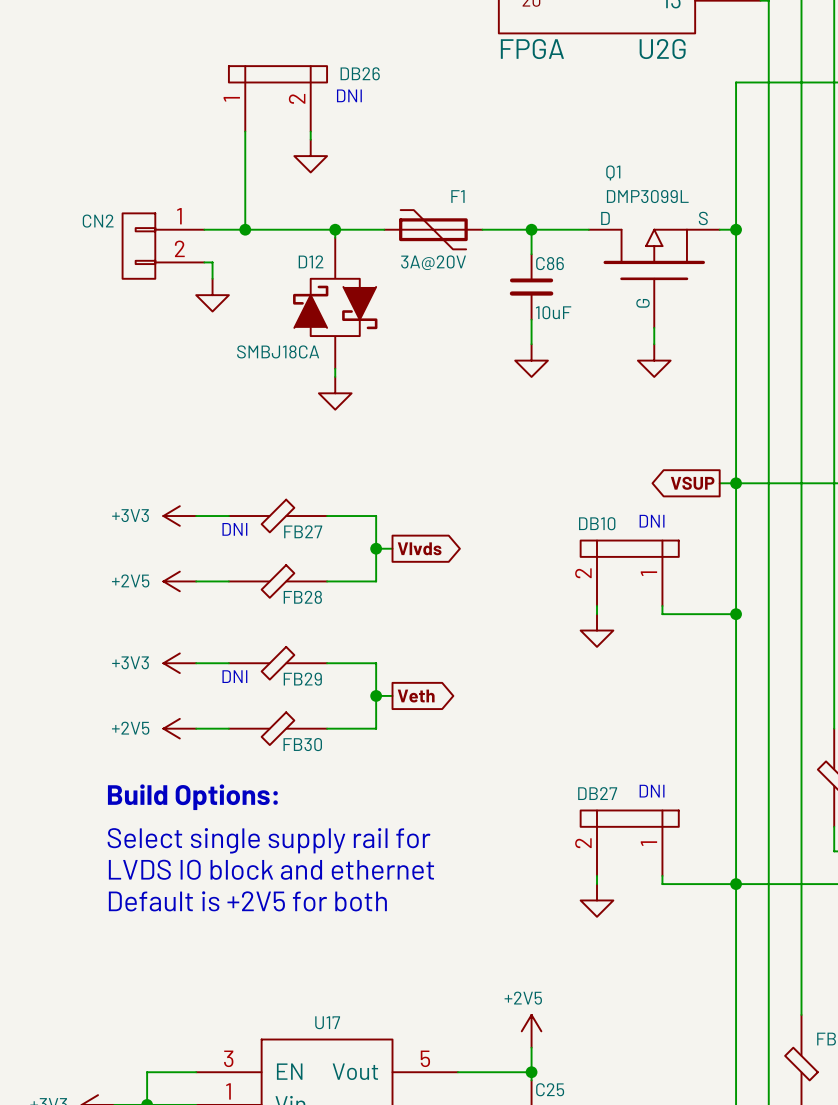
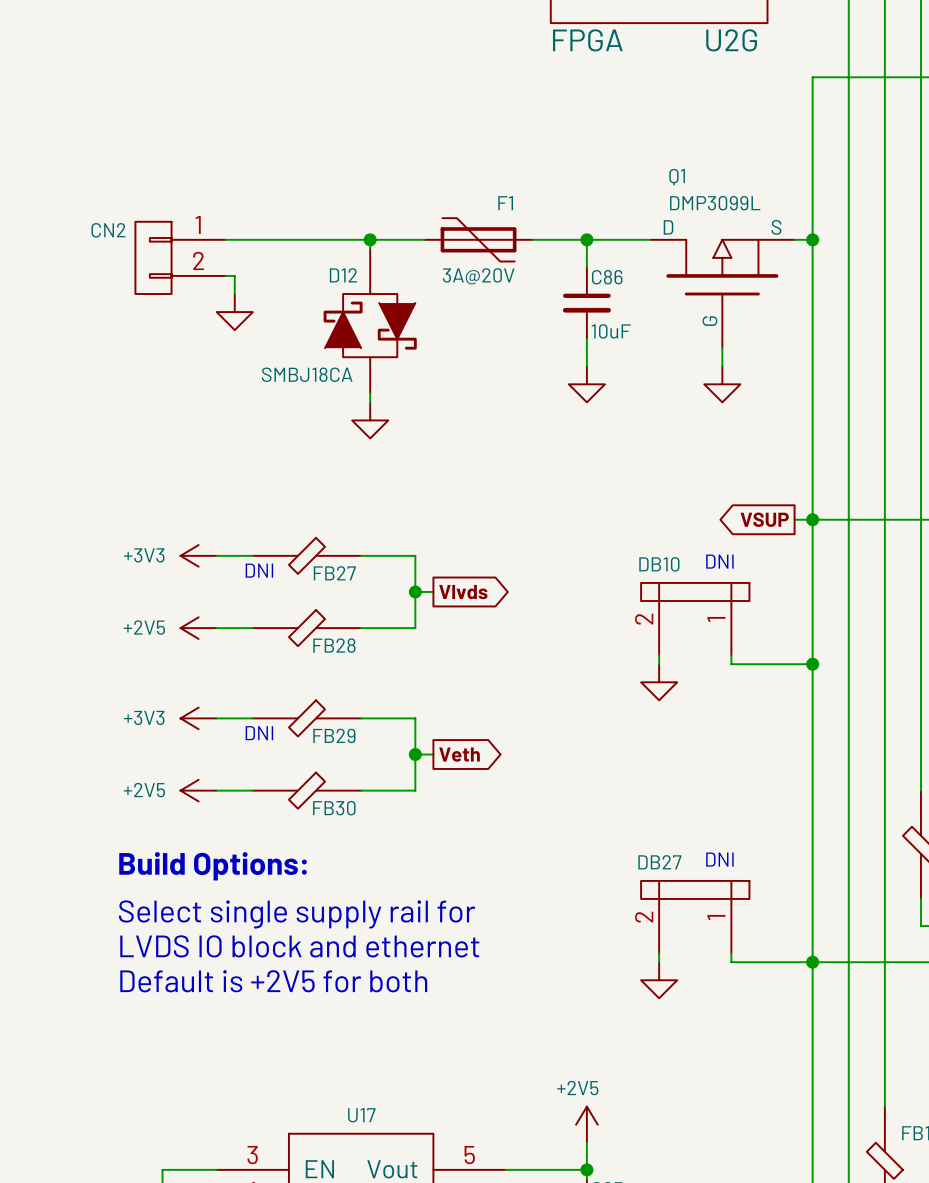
text: DNI (349, 95) -> none
DB26: (277, 98) -> none
wire: (245, 131) (245, 229) -> none
wire: (310, 131) (310, 139) -> none
power symbol: (310, 156) -> none
junction: (245, 229) -> none

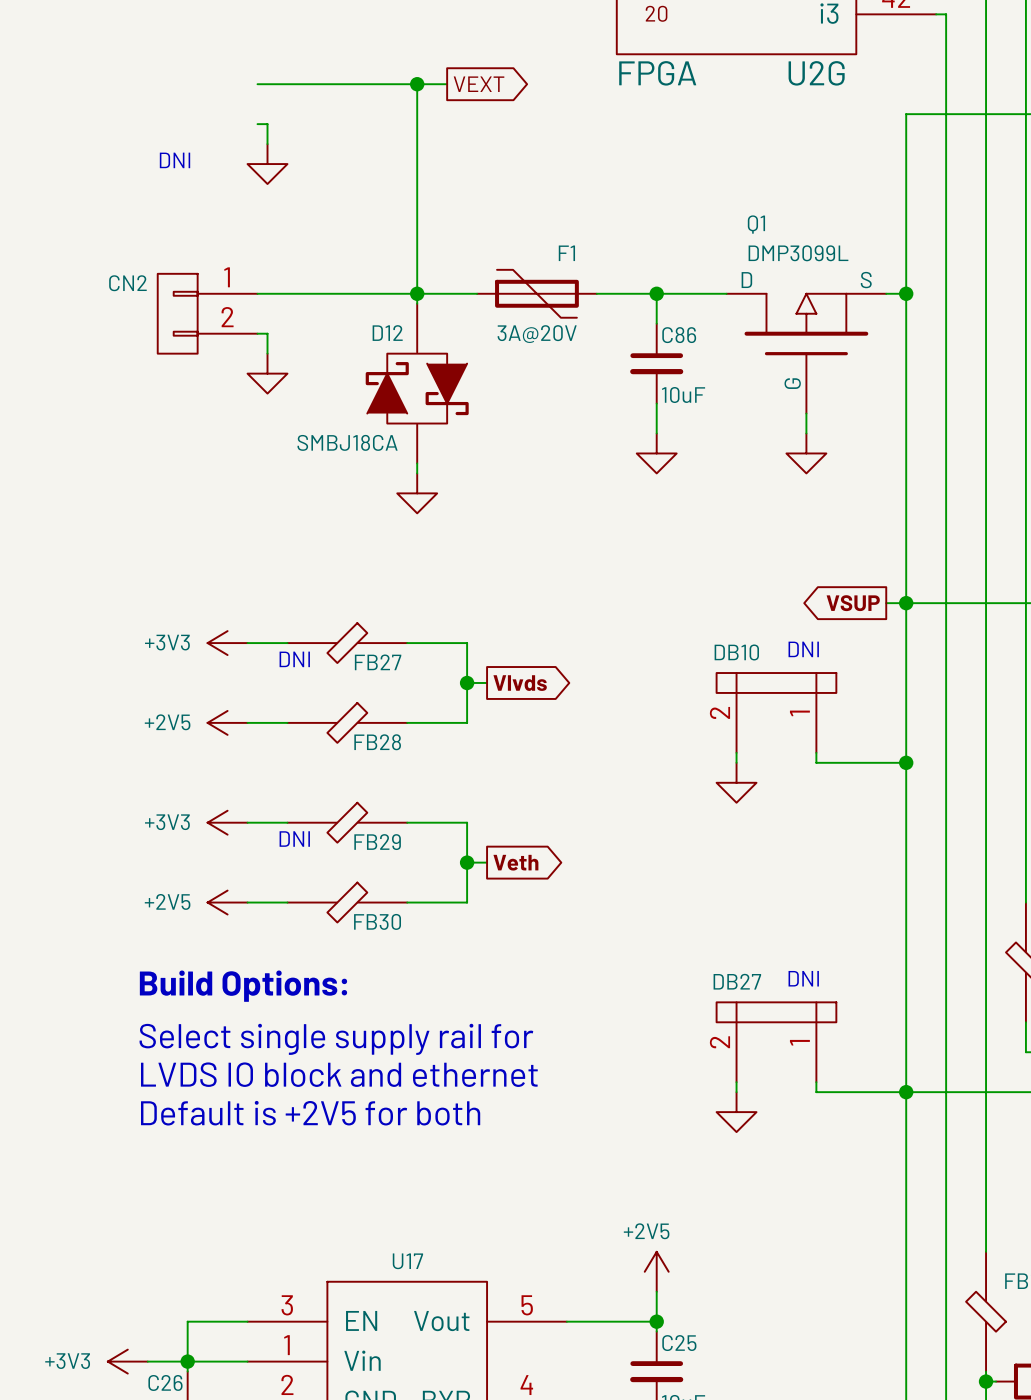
wire: none -> (257, 84) (447, 84)
wire: none -> (417, 84) (417, 293)
junction: none -> (417, 84)
global label: none -> VEXT (479, 84)
wire: none -> (257, 124) (267, 124) (267, 144)
text: none -> DNI (175, 160)
power symbol: none -> (267, 164)

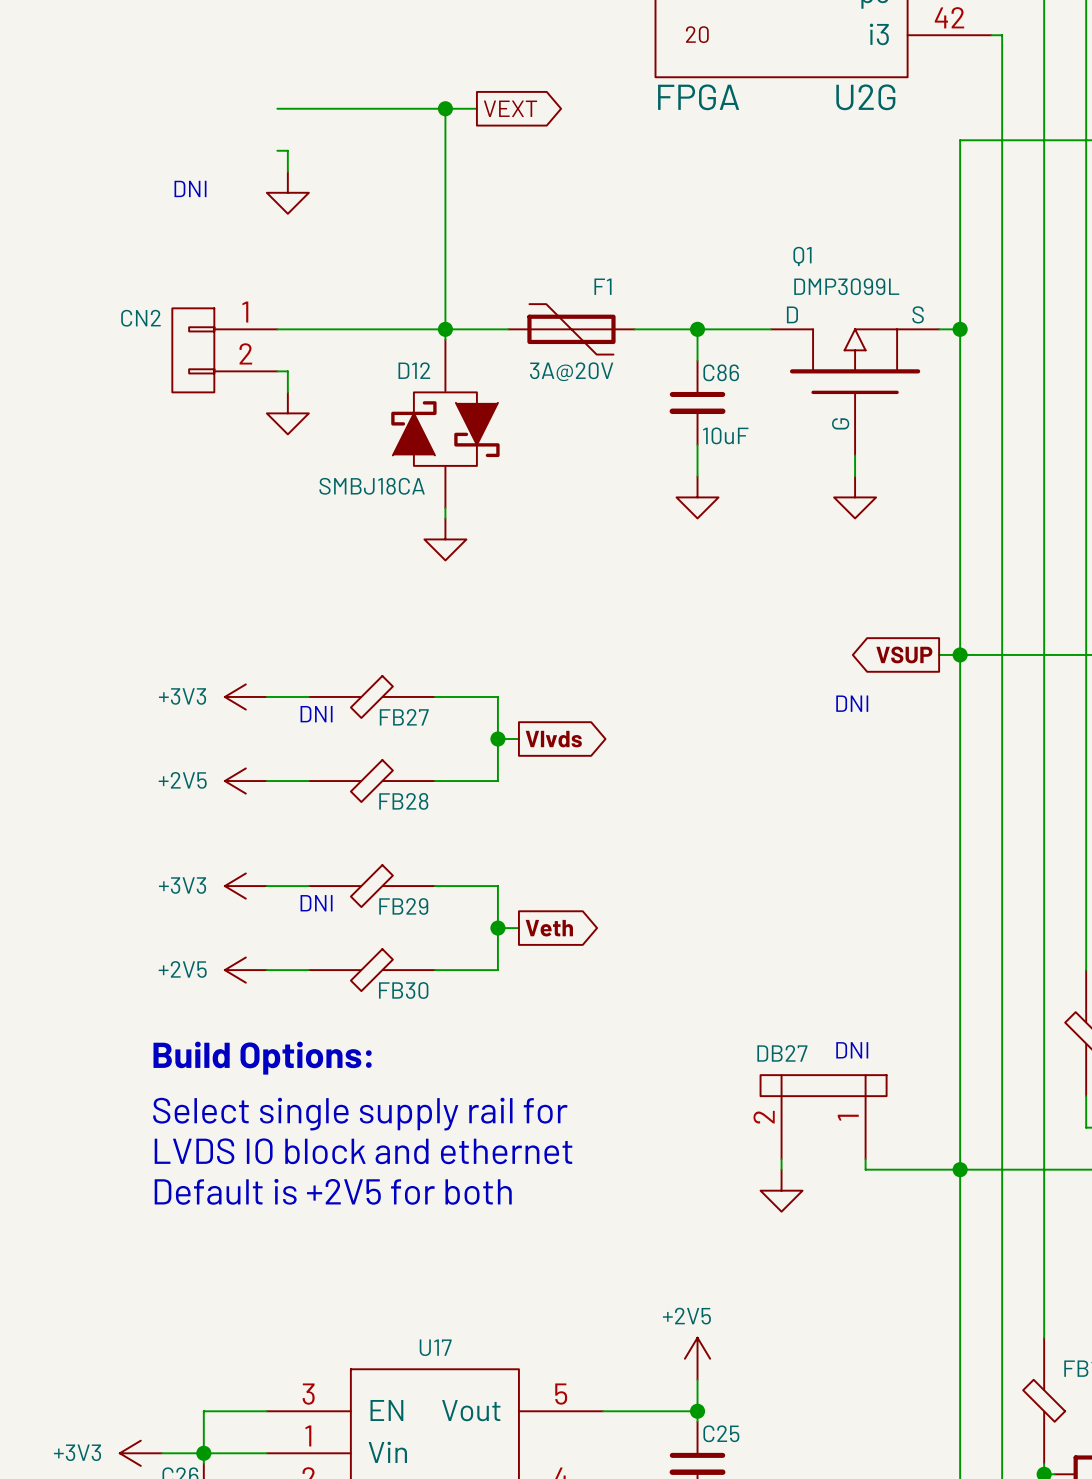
DB10: (776, 712) -> none
wire: (736, 752) (736, 762) -> none
wire: (816, 752) (816, 762) (906, 762) -> none
junction: (906, 762) -> none
power symbol: (736, 782) -> none

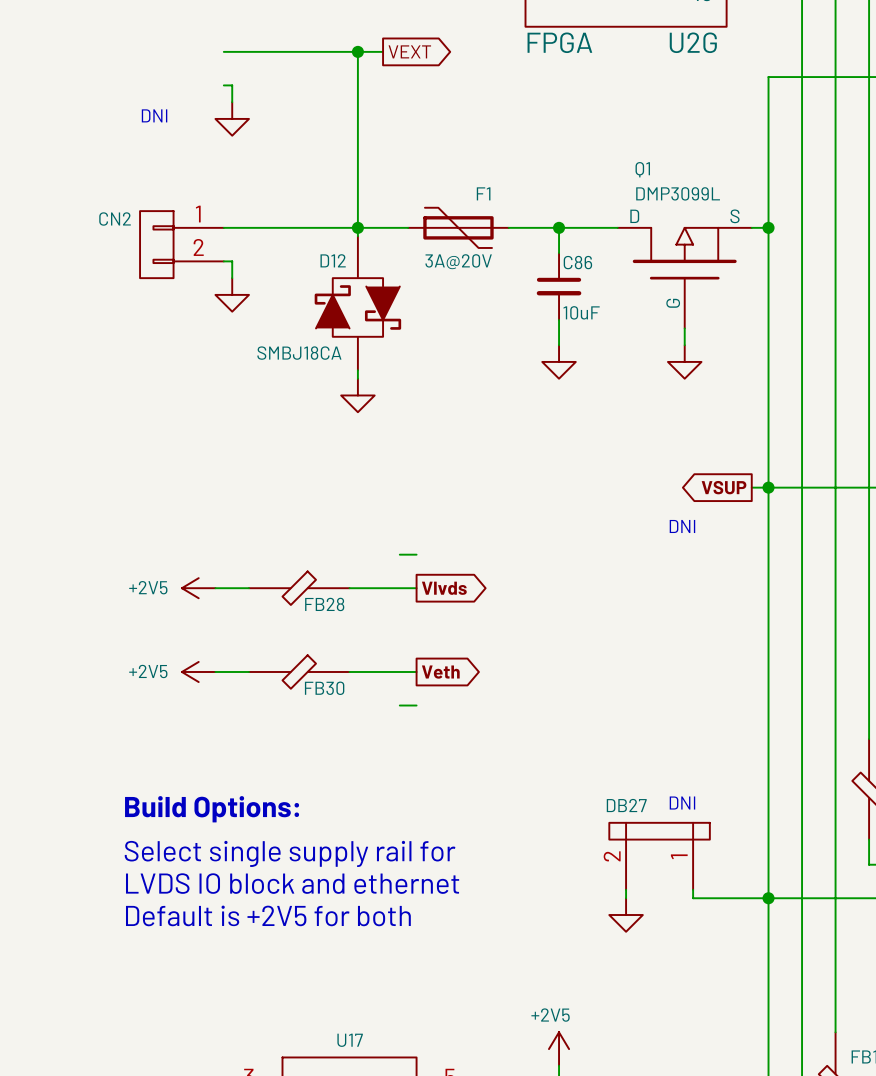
power symbol: +3V3 (245, 696) -> none
wire: (266, 696) (308, 696) -> none
FB27: (371, 696) -> none
wire: (434, 696) (497, 696) (497, 781) -> (416, 588) (399, 588)
text: DNI (316, 714) -> none
junction: (497, 739) -> none
global label position: Vlvds (553, 739) -> Vlvds (444, 588)
power symbol: +3V3 (245, 886) -> +2V5 (198, 671)
wire: (497, 886) (497, 970) (434, 970) -> (399, 671) (416, 671)
text: DNI (316, 903) -> none
FB29 name: FB29 (403, 906) -> FB30 (324, 688)
junction: (497, 928) -> none
global label position: Veth (549, 928) -> Veth (440, 672)
power symbol: +2V5 (245, 970) -> none
wire: (266, 970) (308, 970) -> none
FB30: (371, 970) -> none

